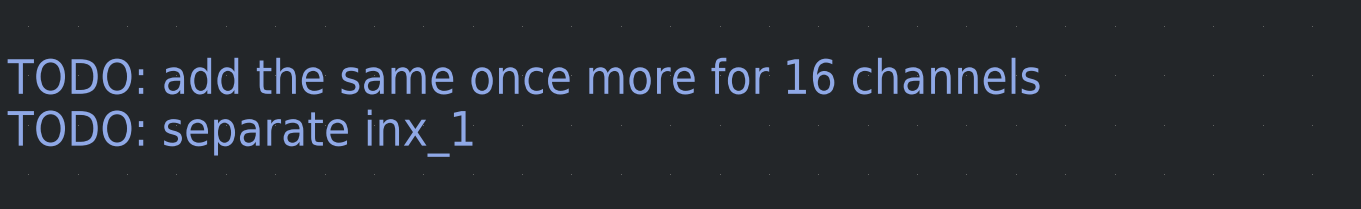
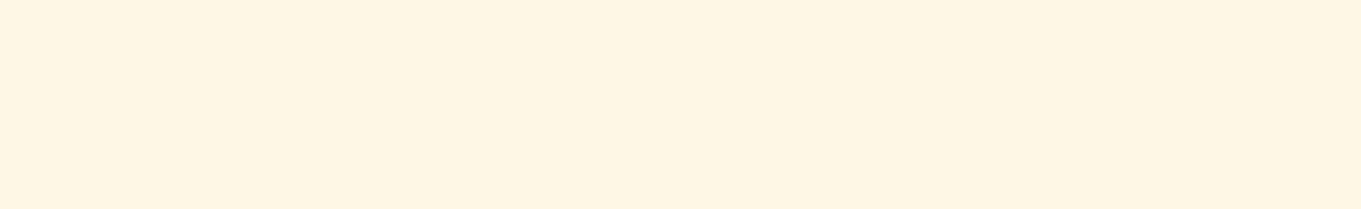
text: TODO: add the same once more for 16 channels (523, 76) -> none
text: TODO: separate inx_1 (240, 133) -> none

